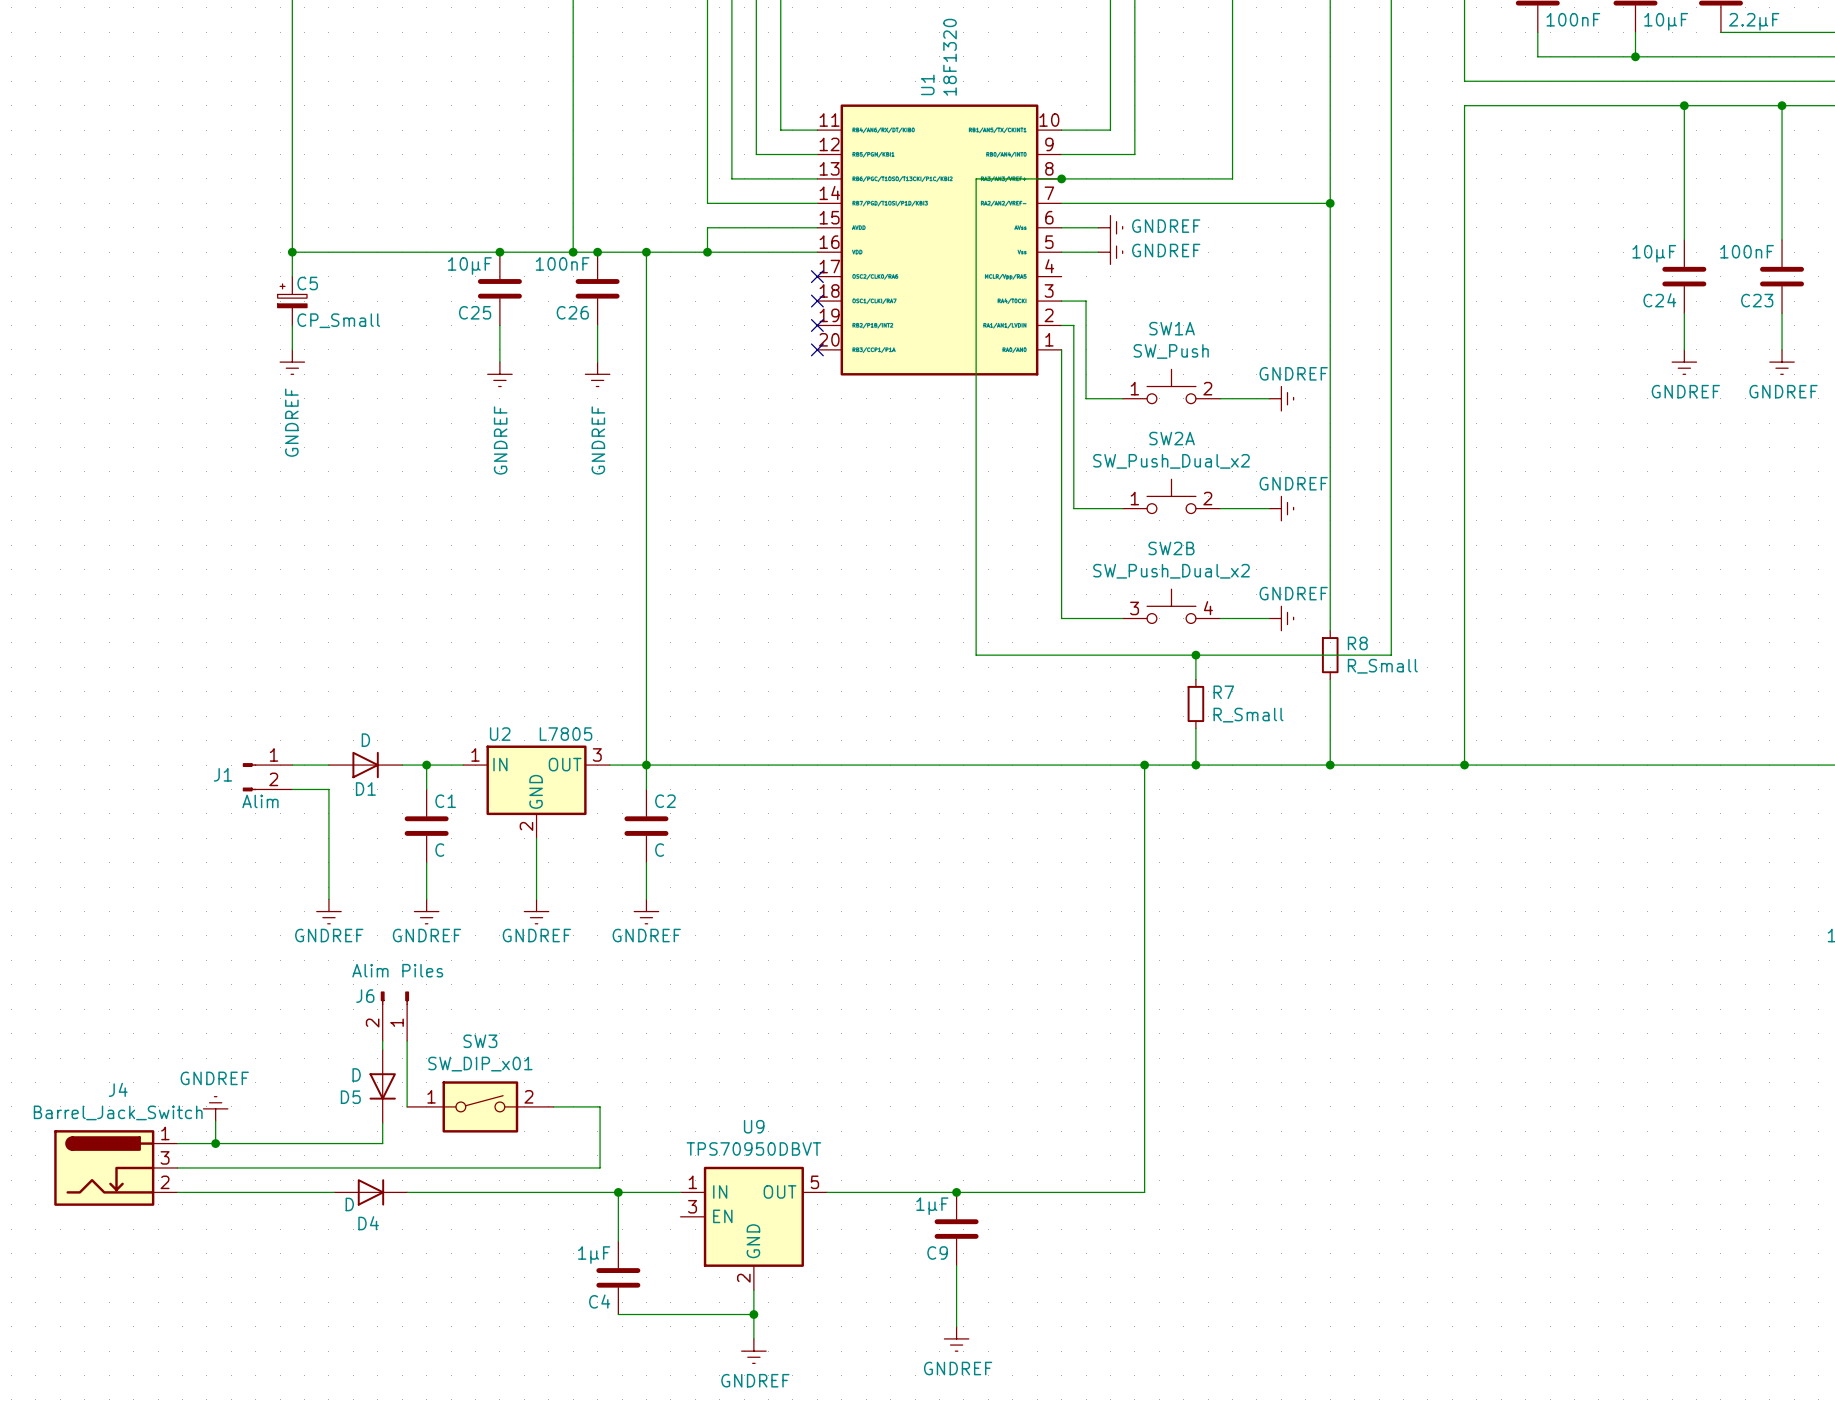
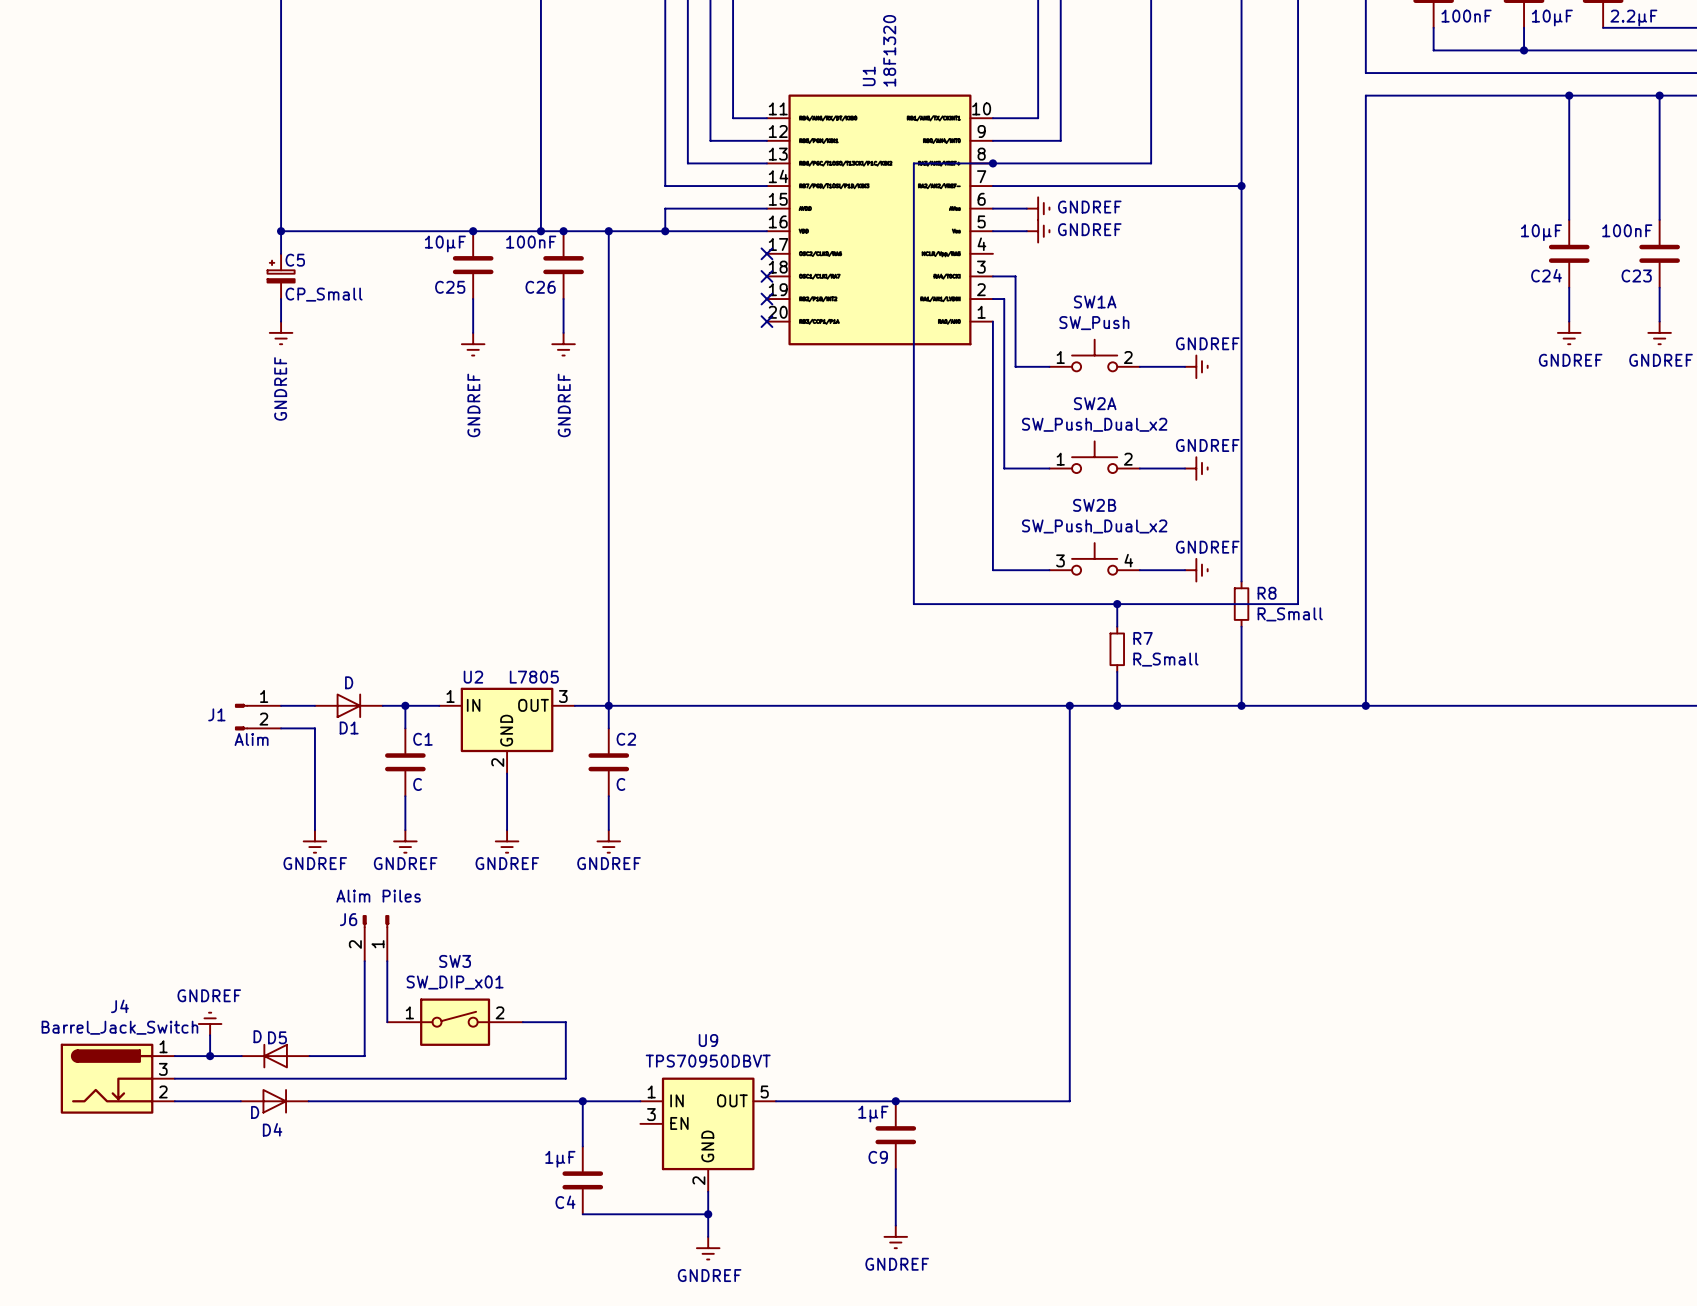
D5 rotation: 0° (382, 1086) -> 90° clockwise (275, 1056)
D5 position: (382, 1086) -> (275, 1056)
D5 name position: D5 (350, 1097) -> D5 (277, 1037)
D4 position: (370, 1192) -> (274, 1101)

